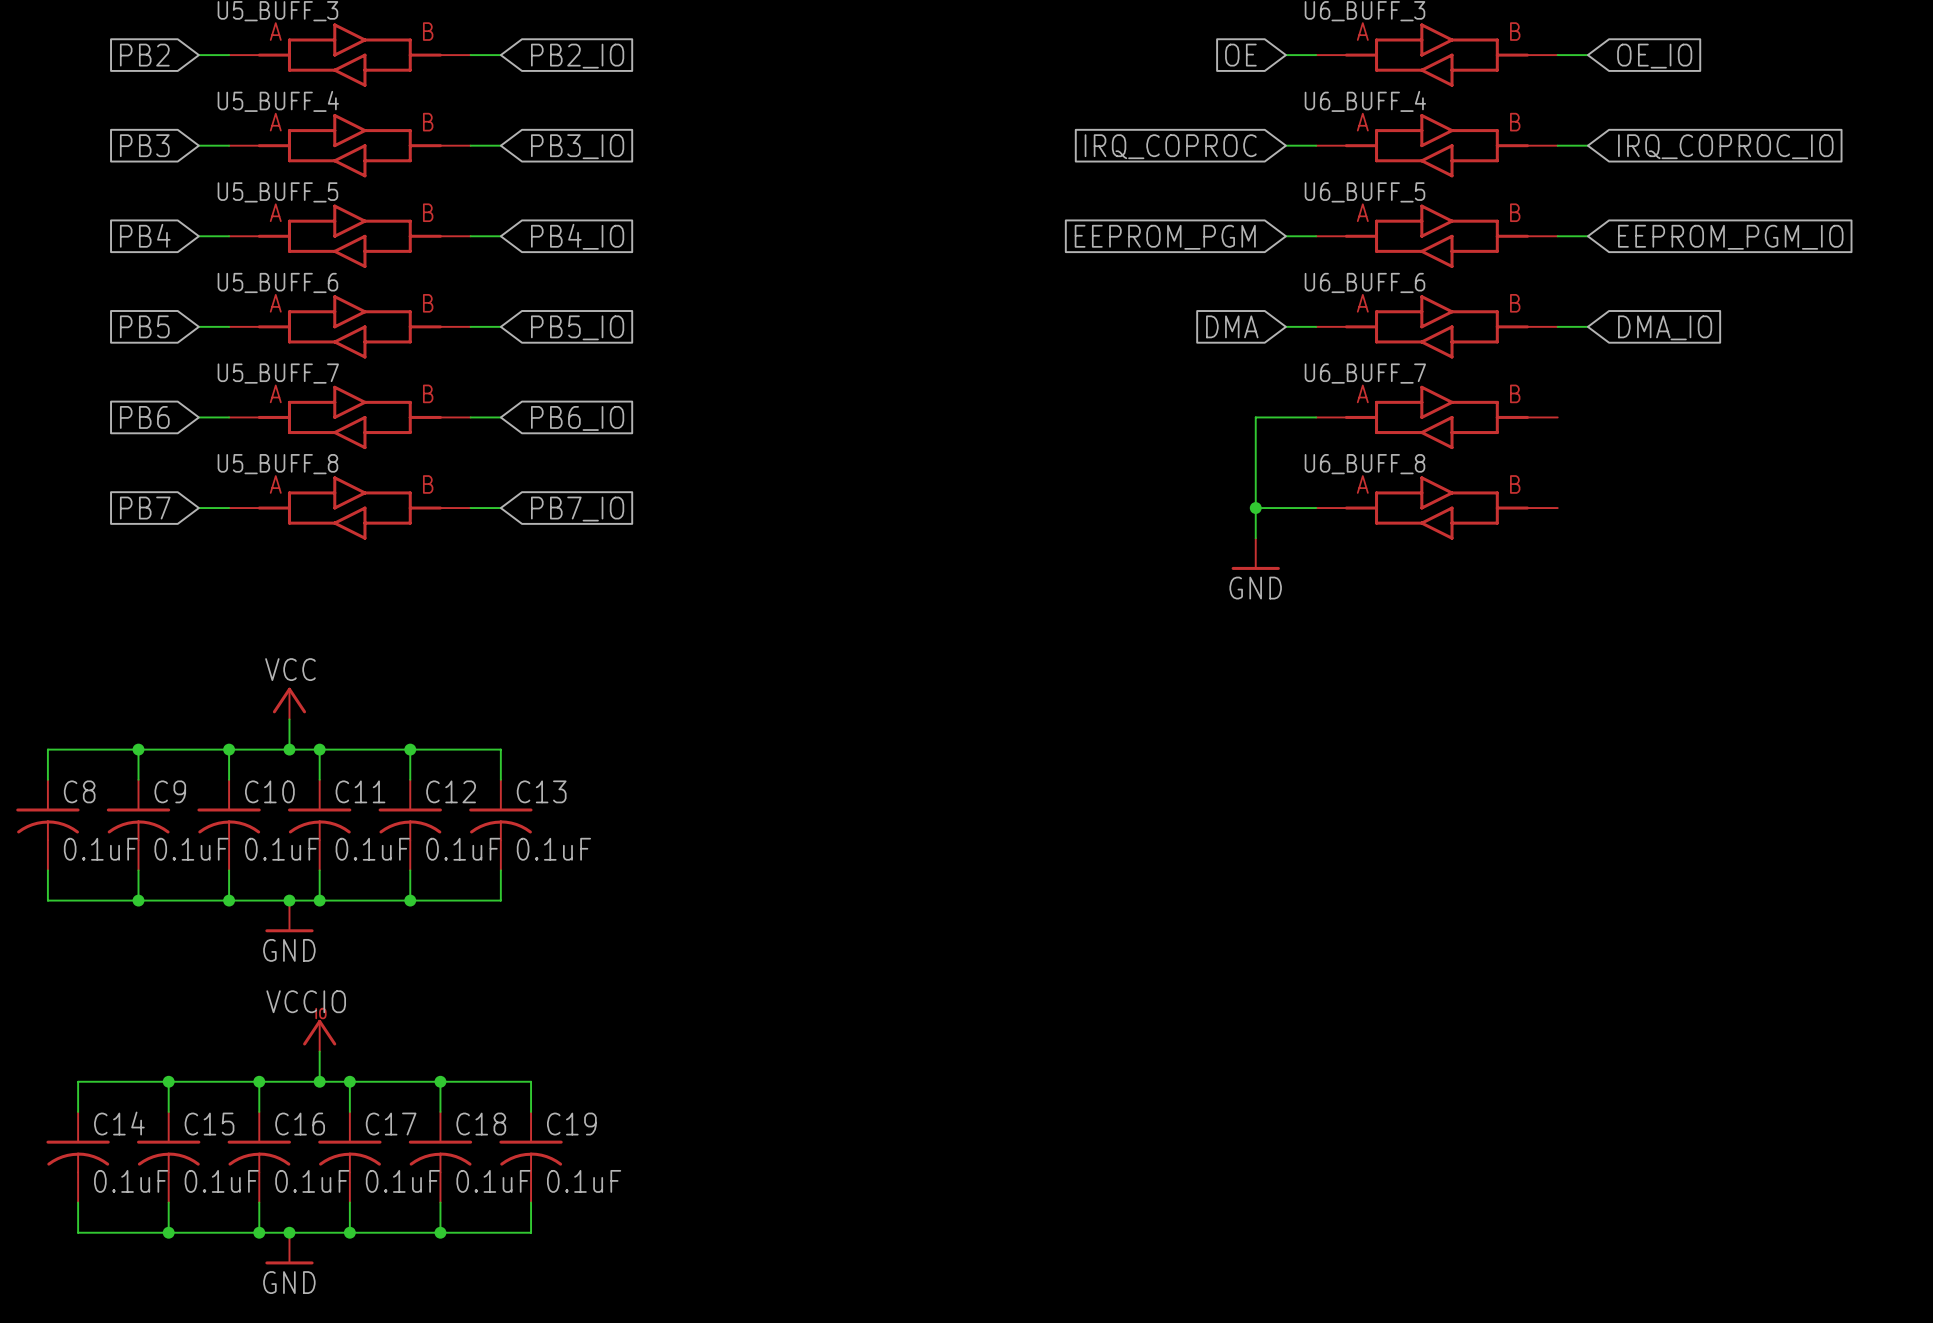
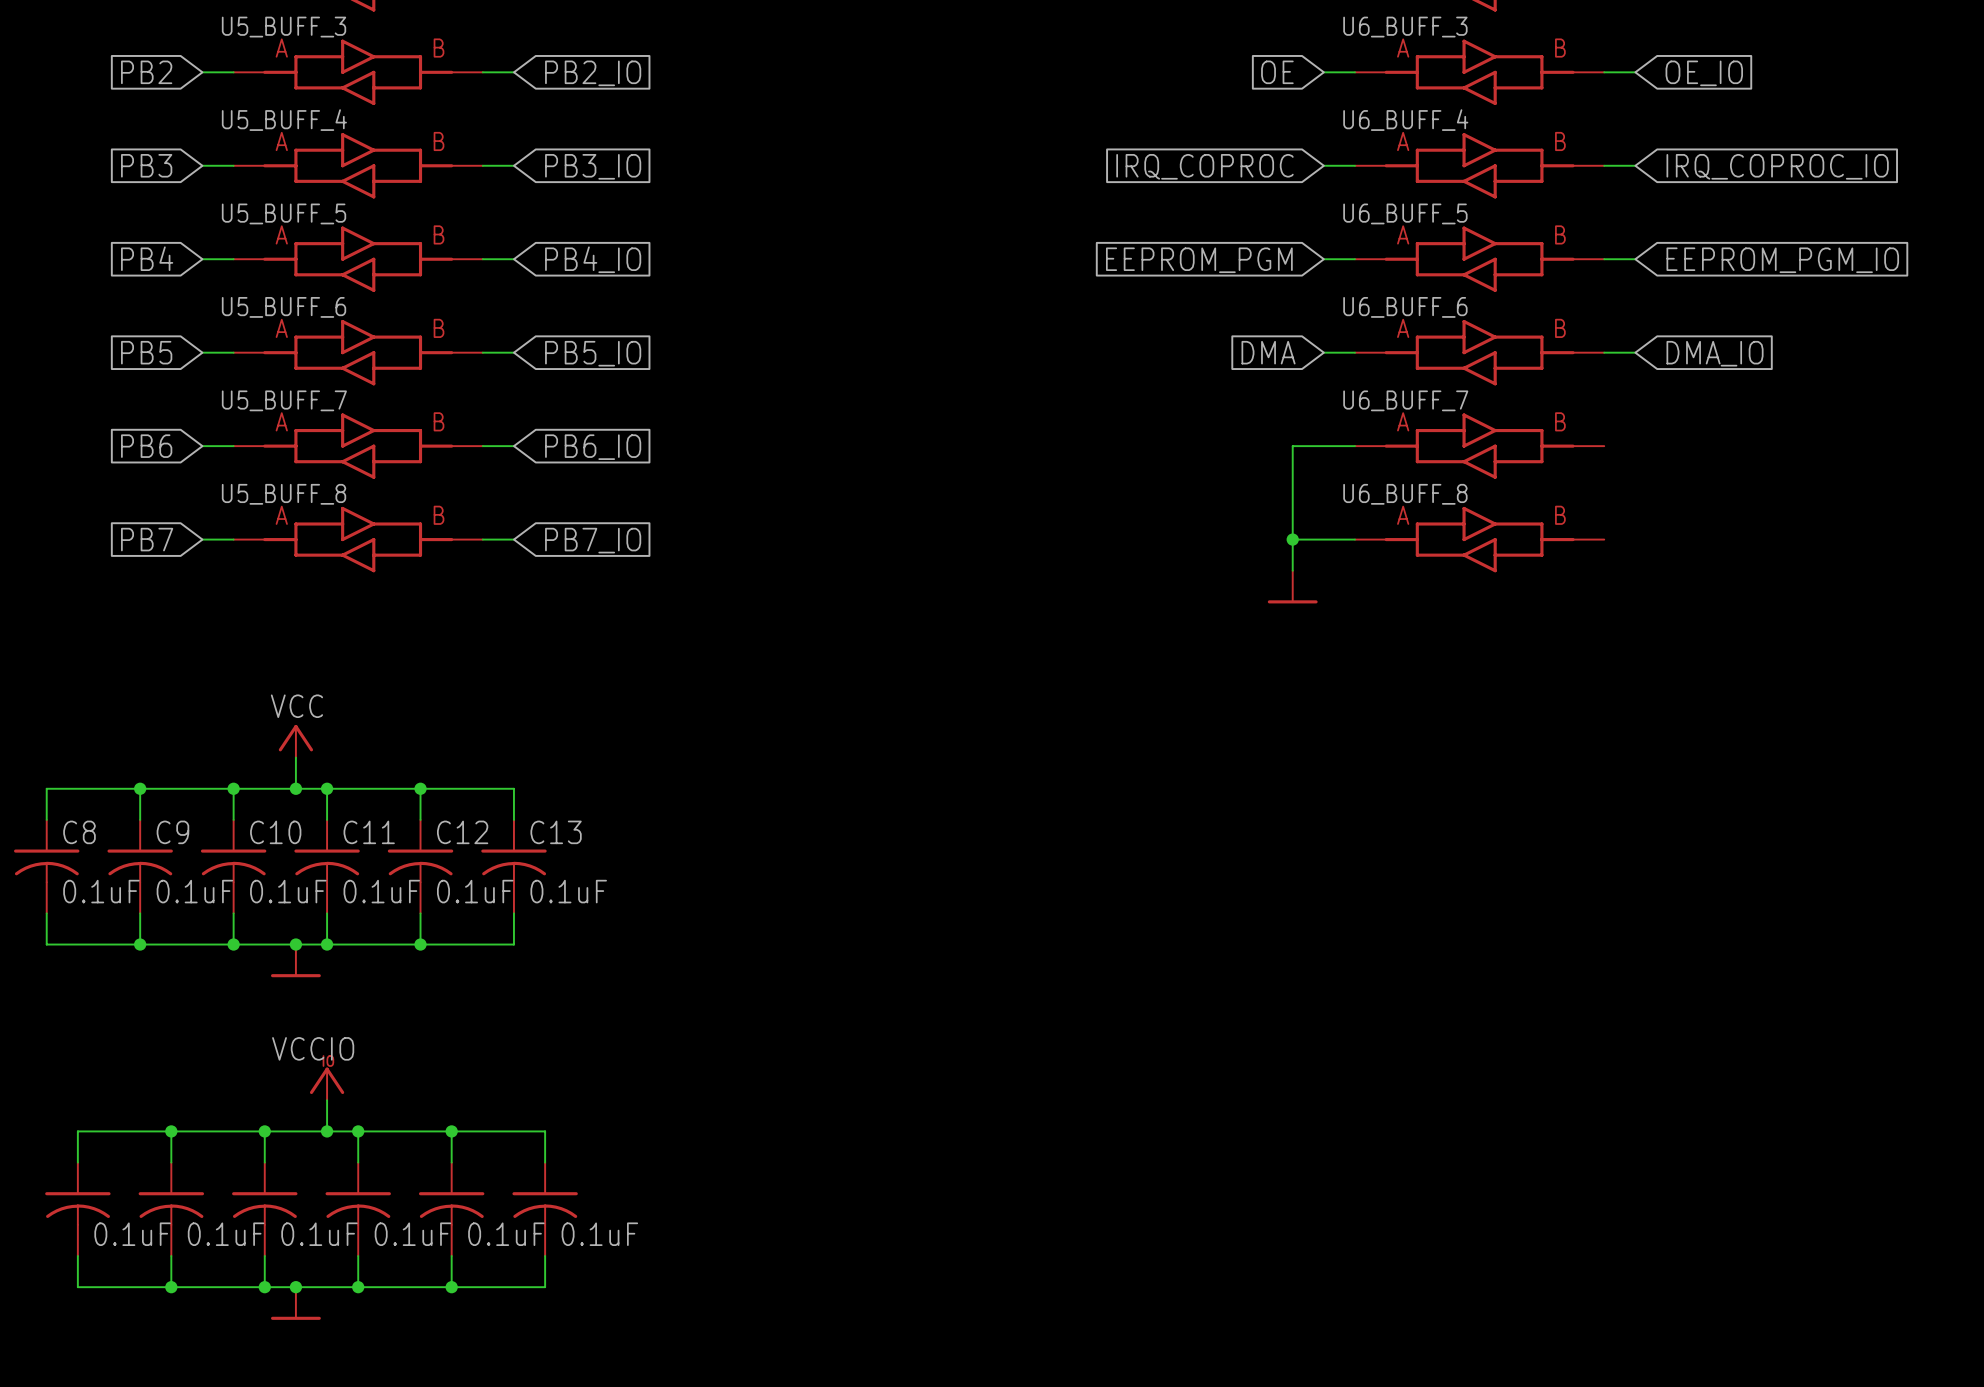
power symbol text: GND (1255, 588) -> none
power symbol text: GND (289, 950) -> none
C14 name: C14 (119, 1123) -> none
C15 name: C15 (209, 1124) -> none
C16 name: C16 (300, 1124) -> none
C17 name: C17 (391, 1124) -> none
C18 name: C18 (481, 1124) -> none
C19 name: C19 (571, 1124) -> none
power symbol text: GND (289, 1282) -> none

